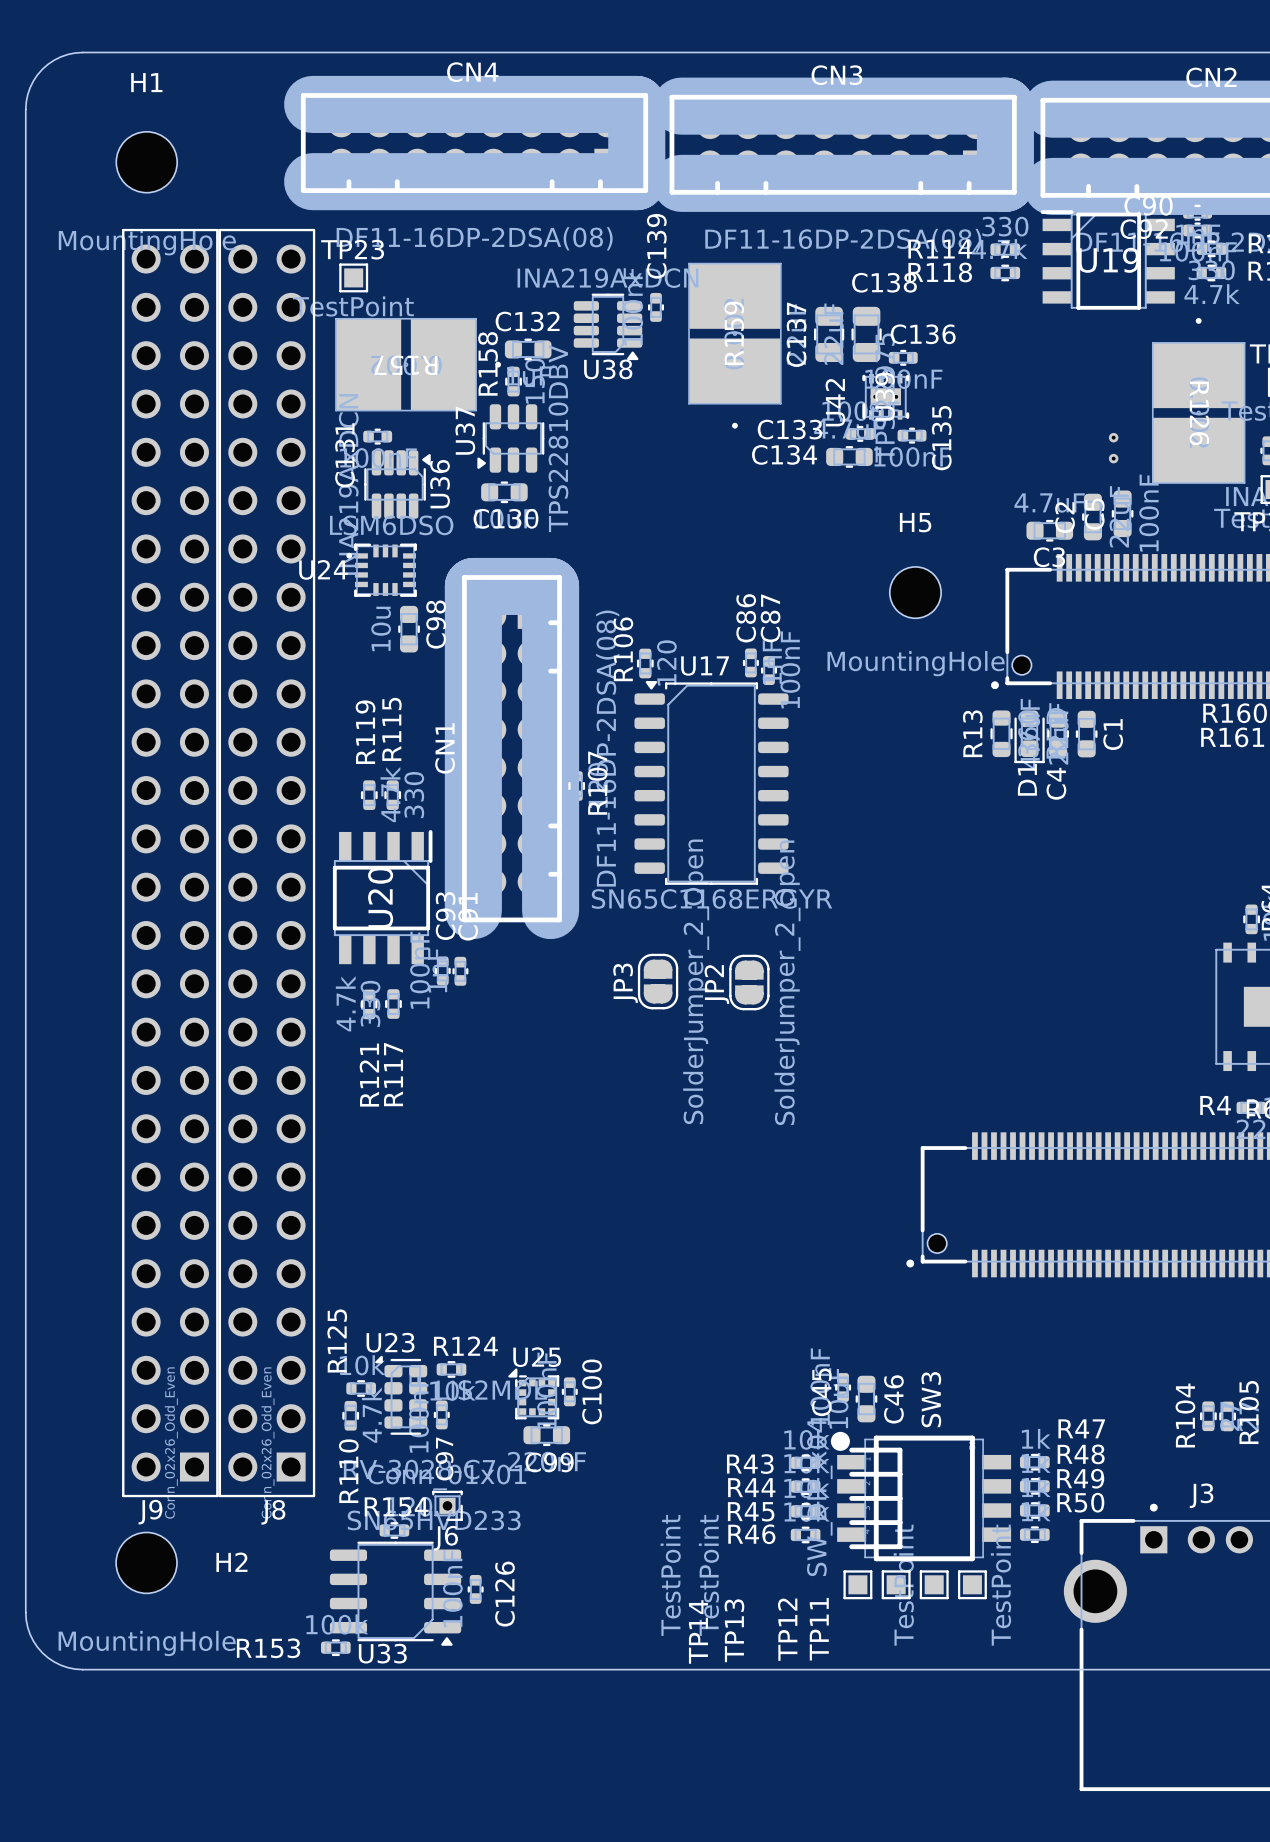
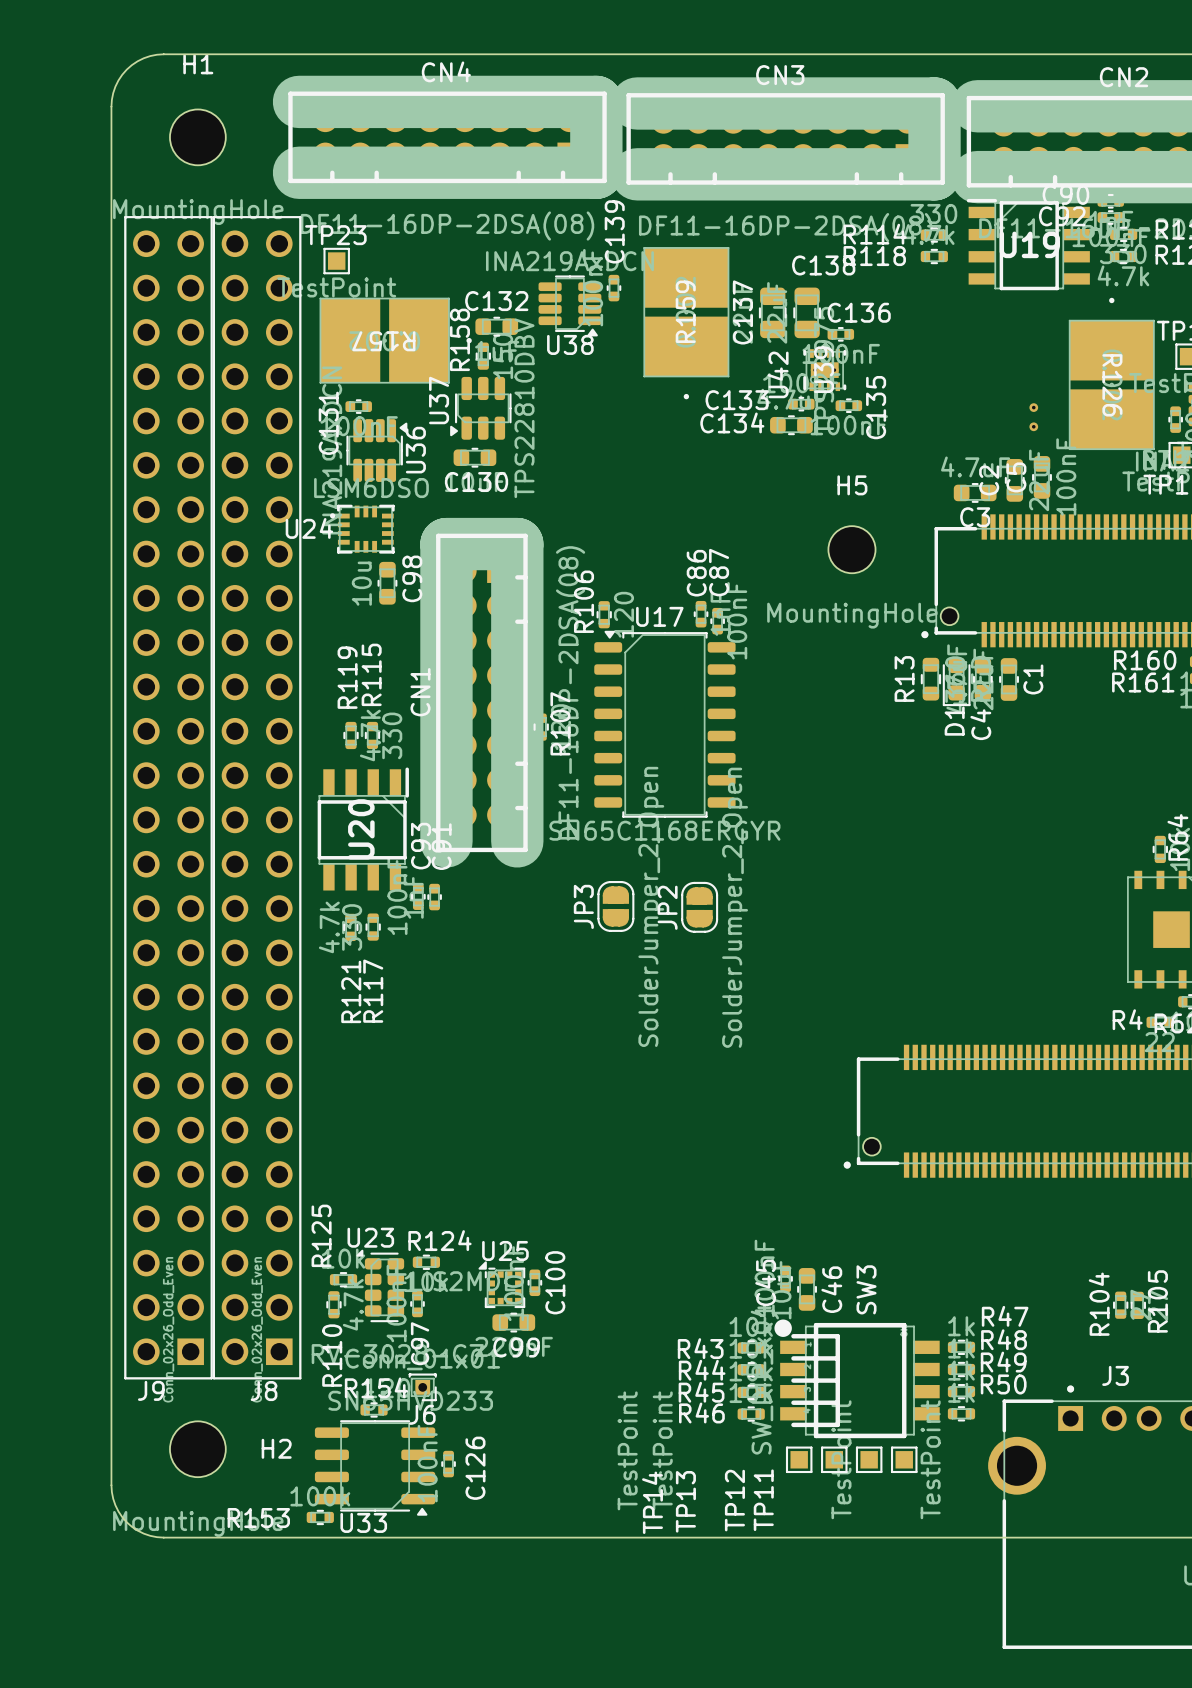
board edge: (165, 52) (82, 52) (61, 56) (48, 64) (33, 81) (27, 94) (25, 109) (26, 1620) (30, 1634) (37, 1647) (48, 1657) (61, 1665) (82, 1669) (165, 1669) -> (163, 54) (143, 58) (126, 69) (115, 86) (111, 106) (111, 1485) (115, 1505) (126, 1522) (143, 1533) (163, 1537)
H1 position: (146, 162) -> (197, 137)
H2 position: (146, 1562) -> (197, 1449)

